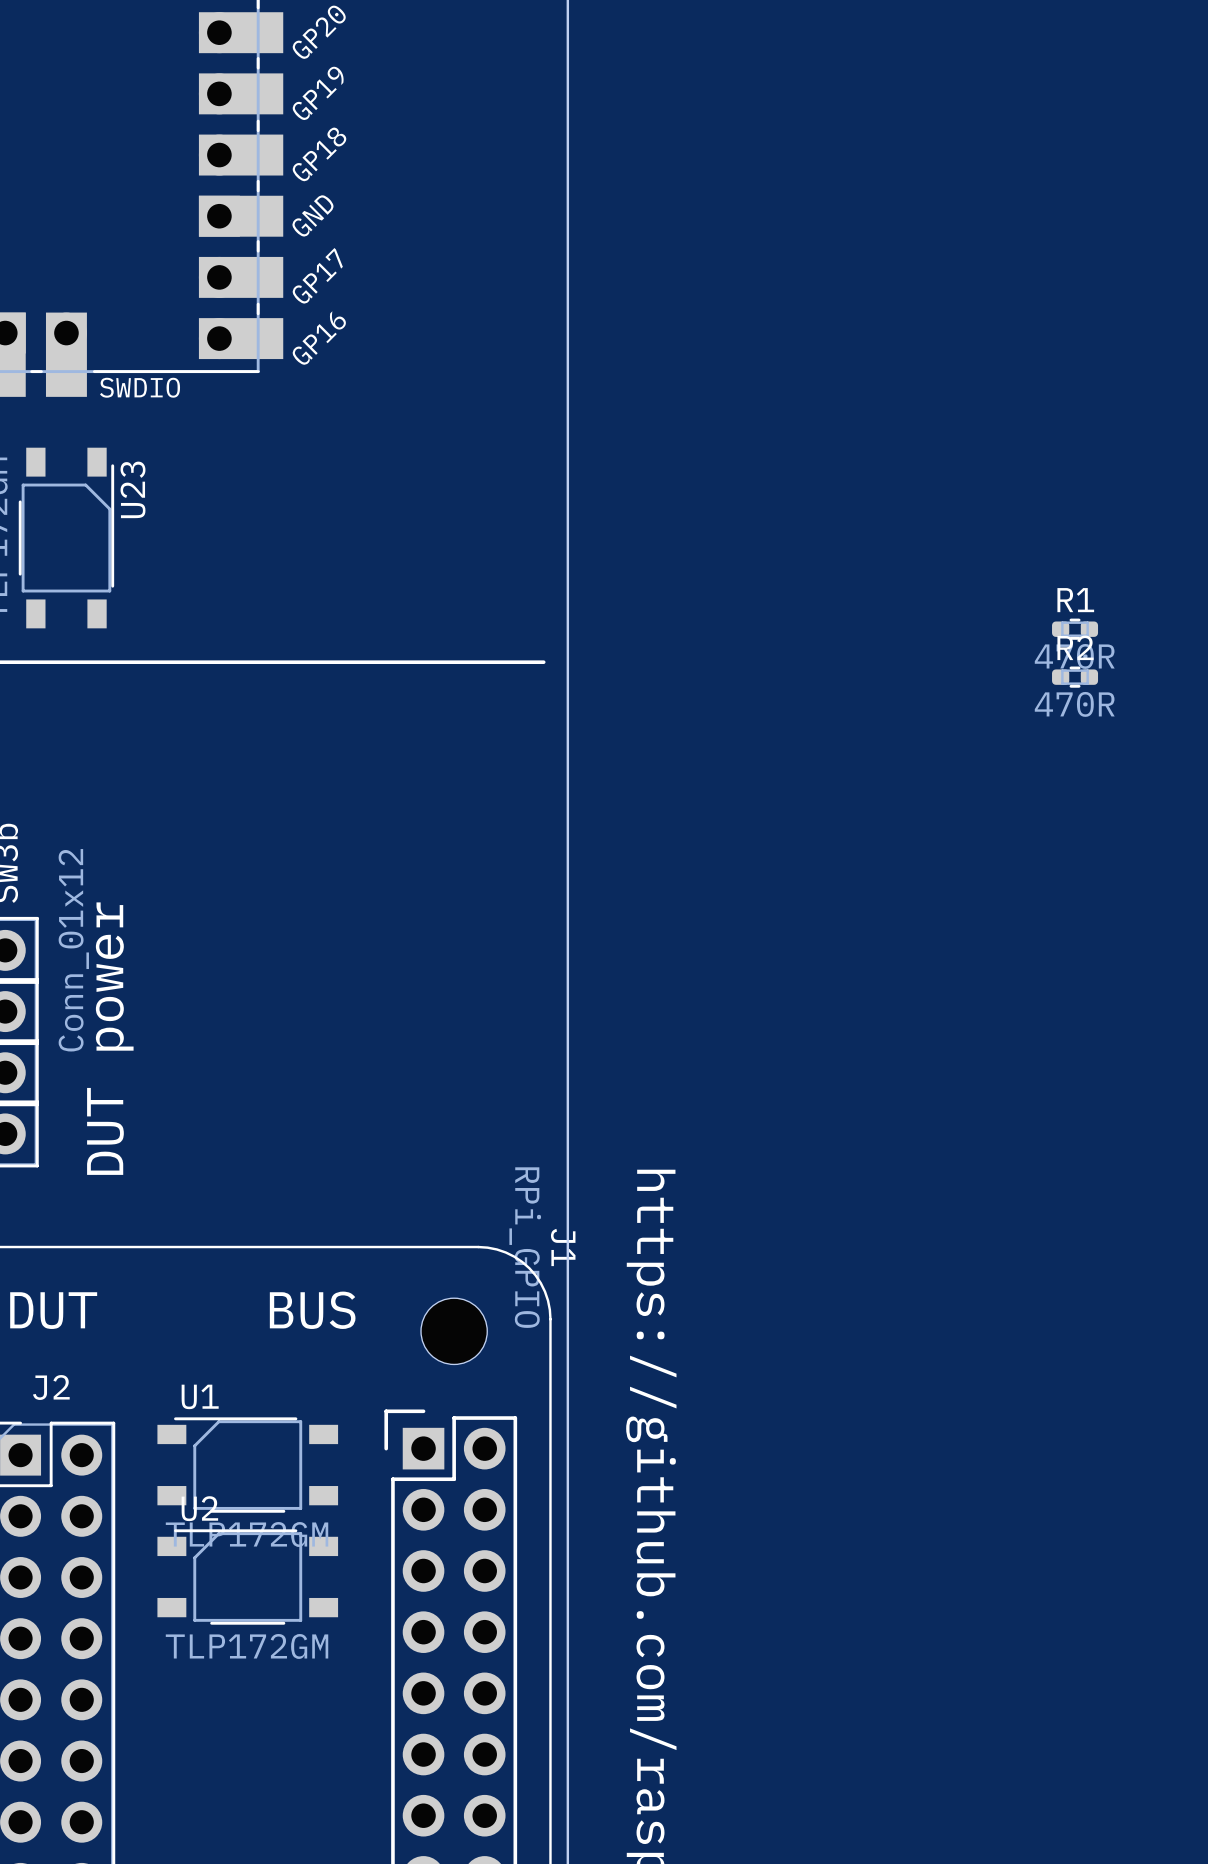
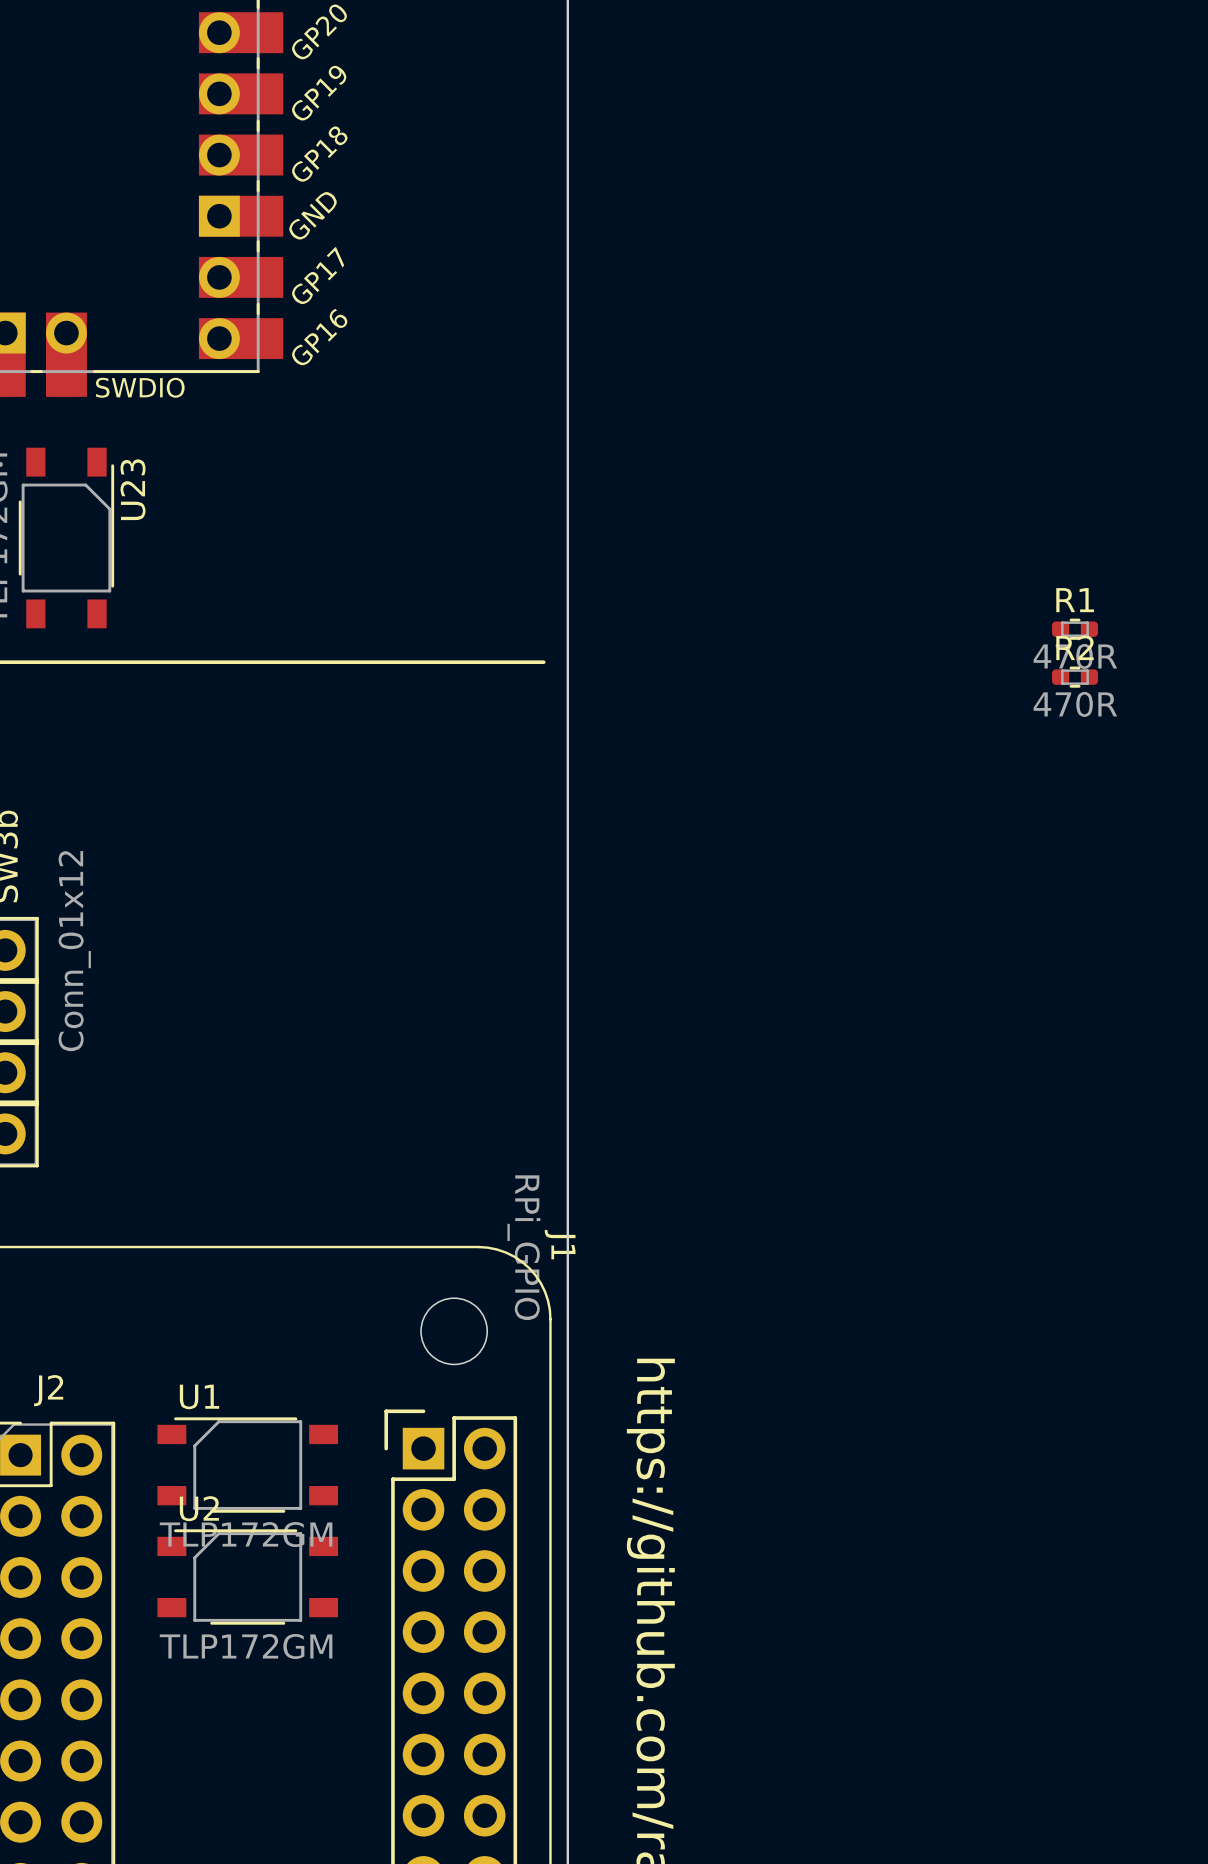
text: DUT power (110, 1038) -> none
text: DUT (53, 1310) -> none
text: BUS (312, 1310) -> none

